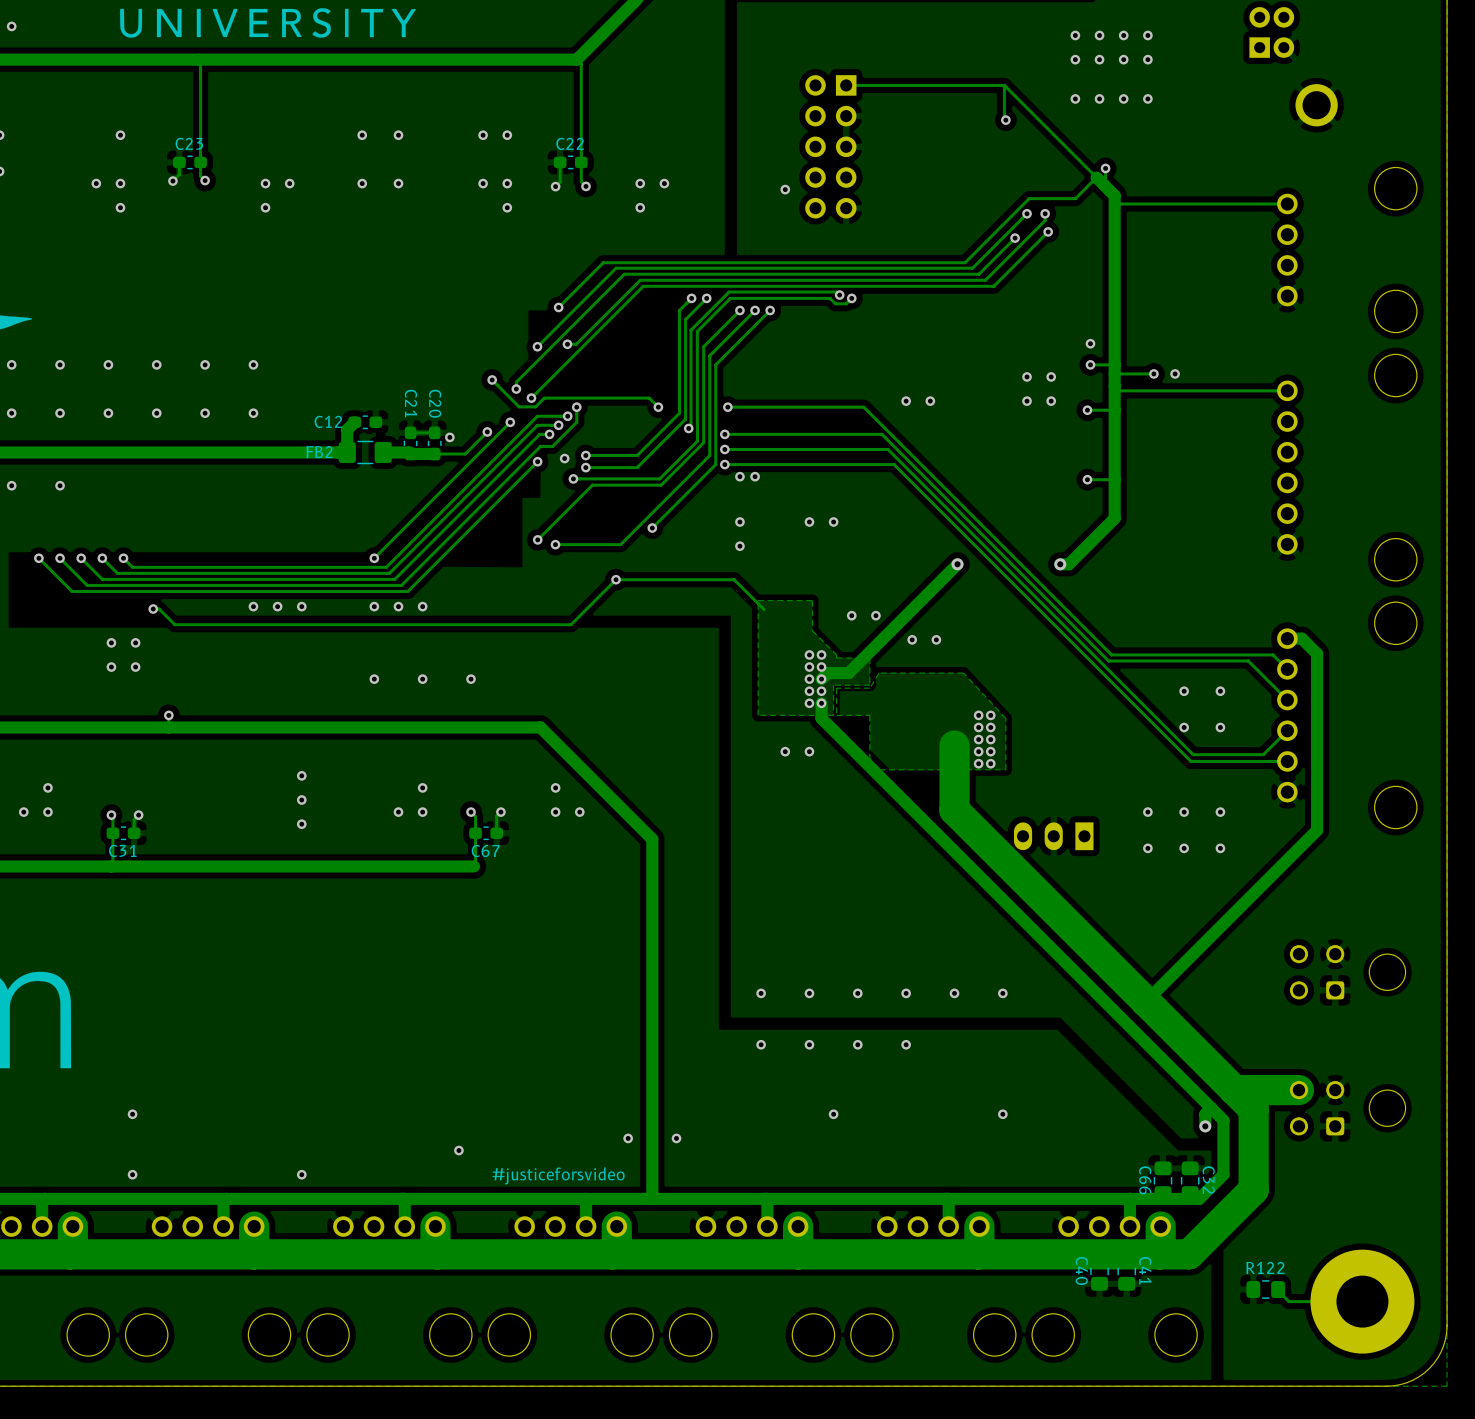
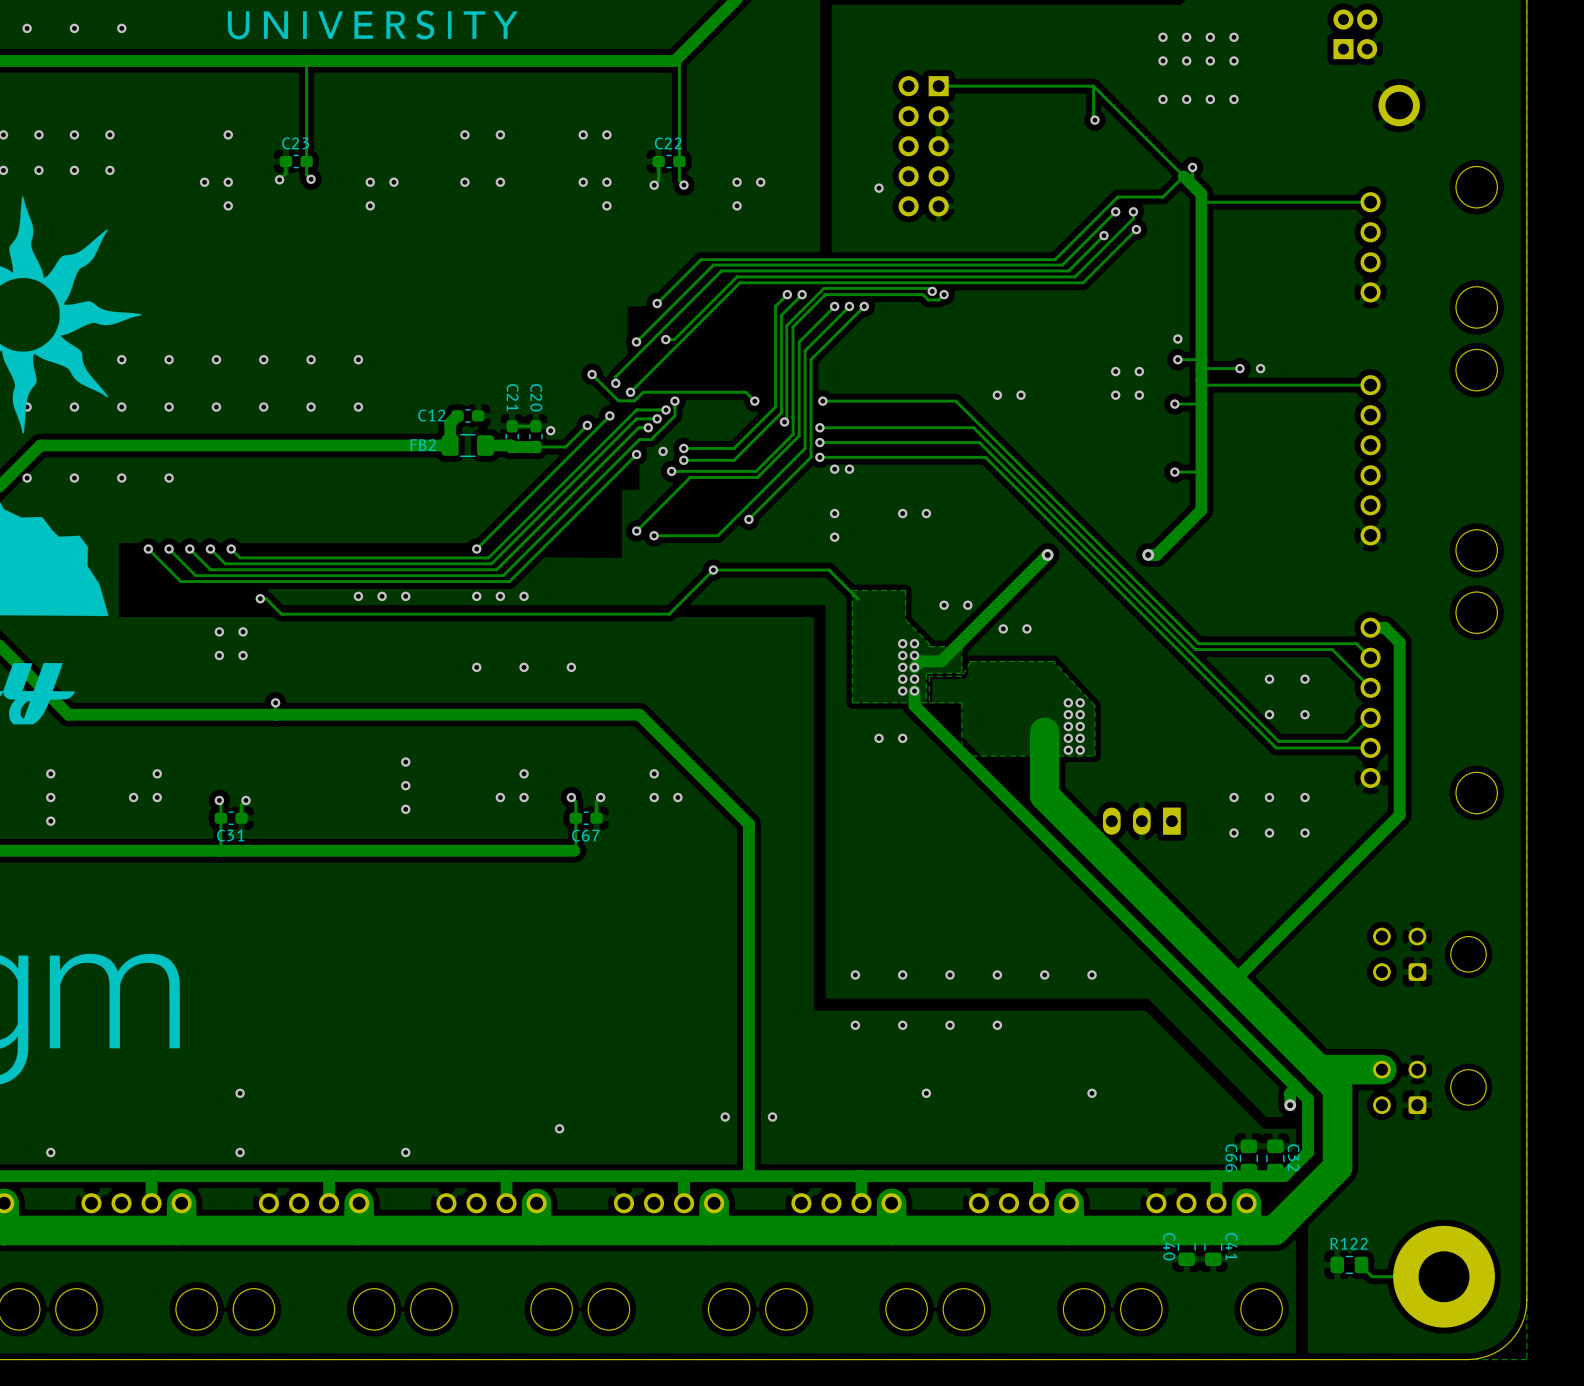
text: #justiceforsvideo (558, 1175) -> none

